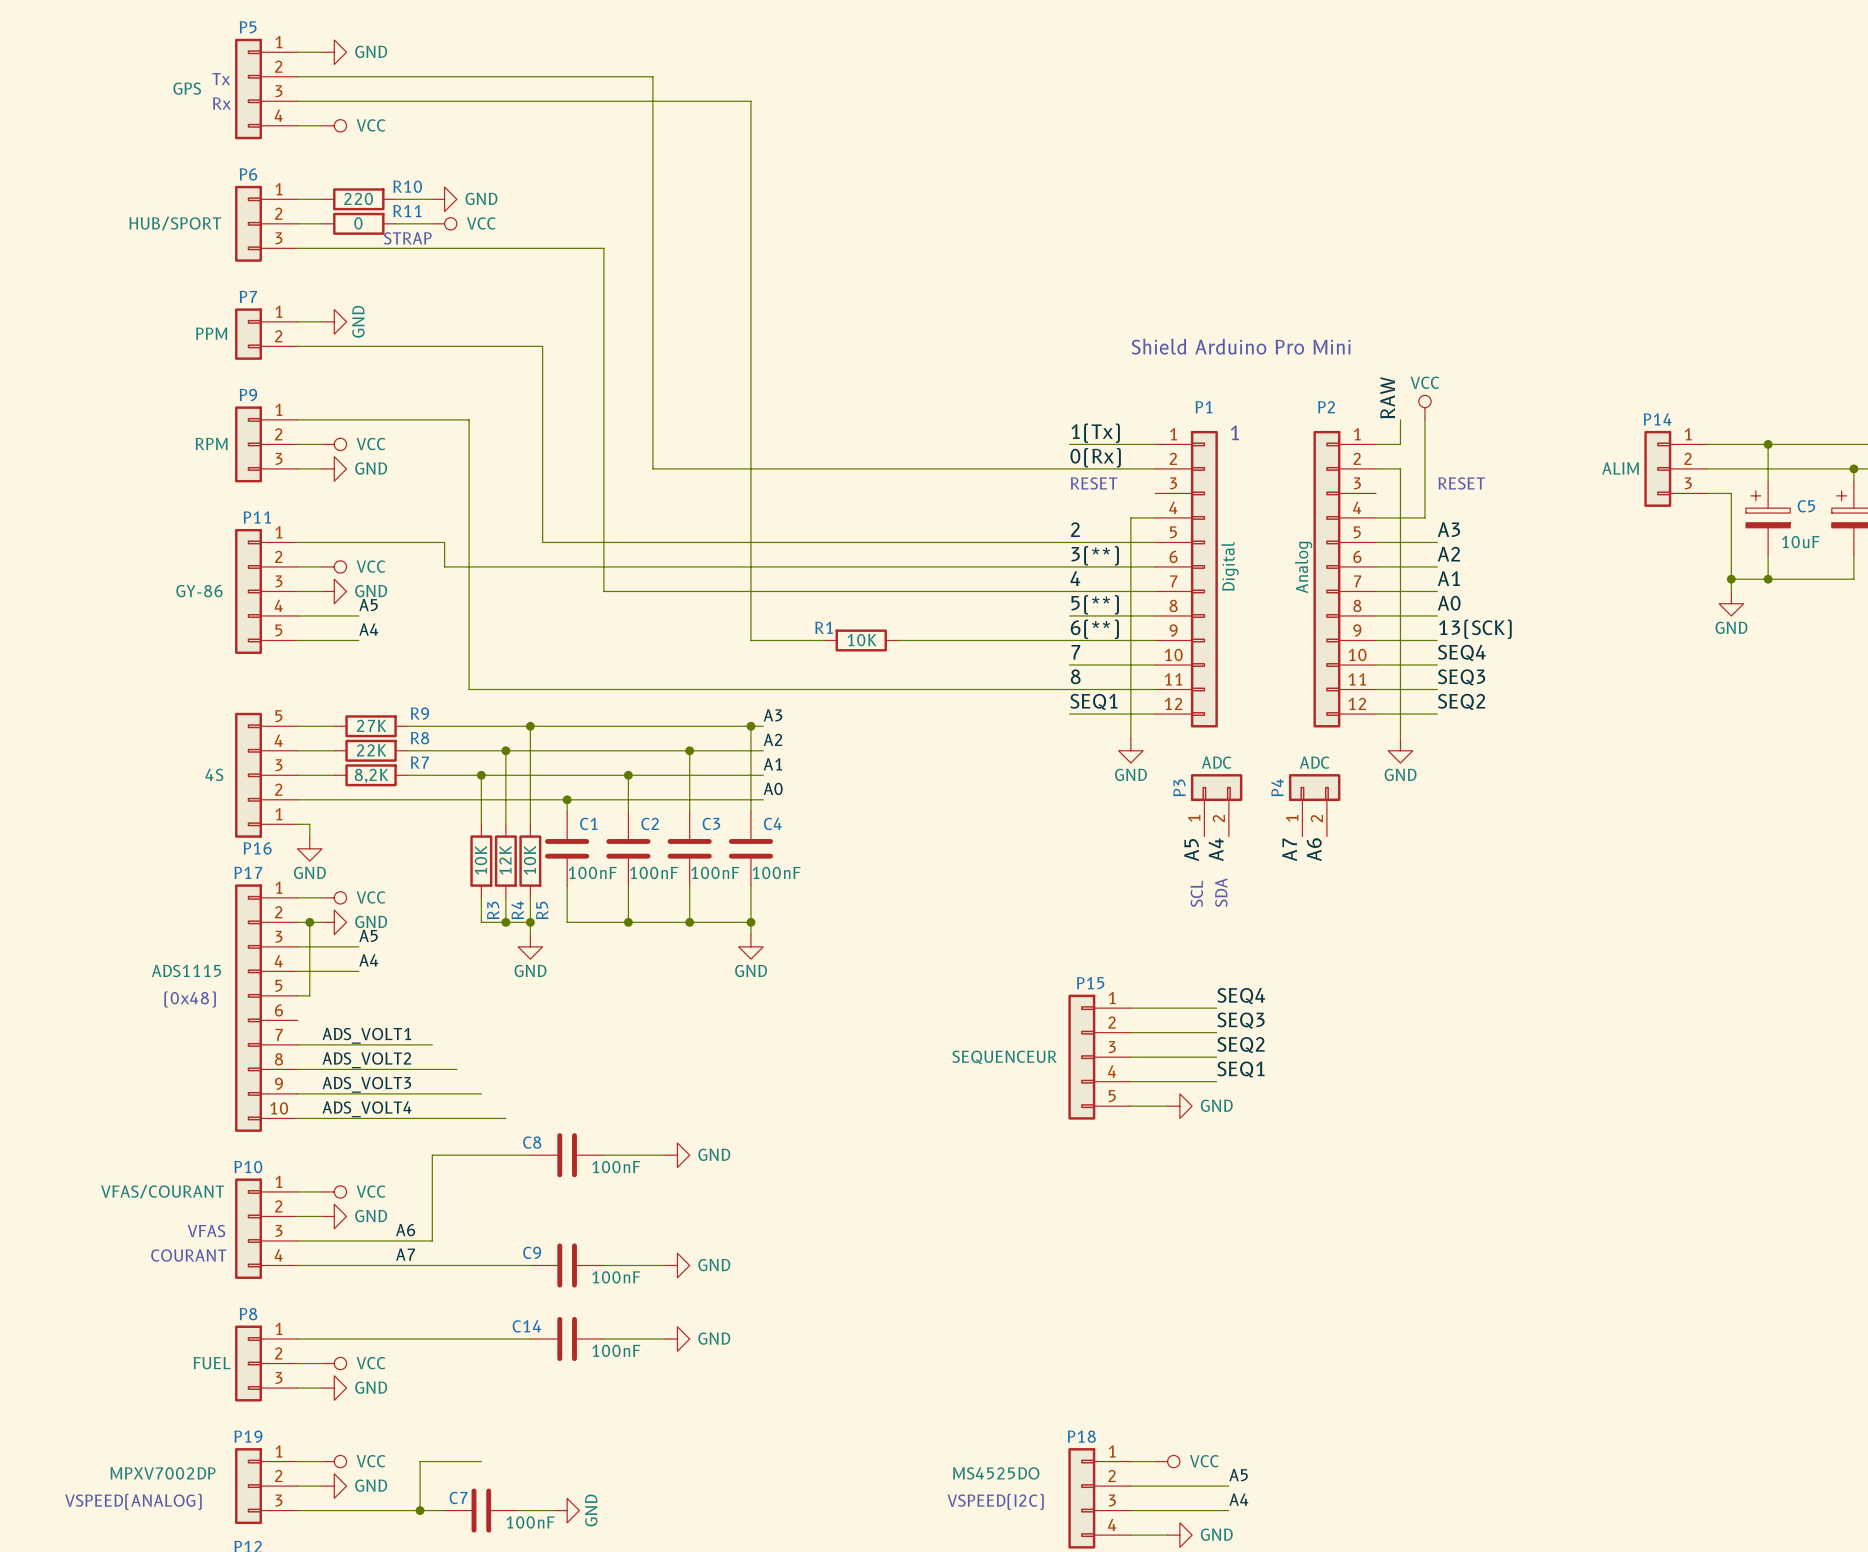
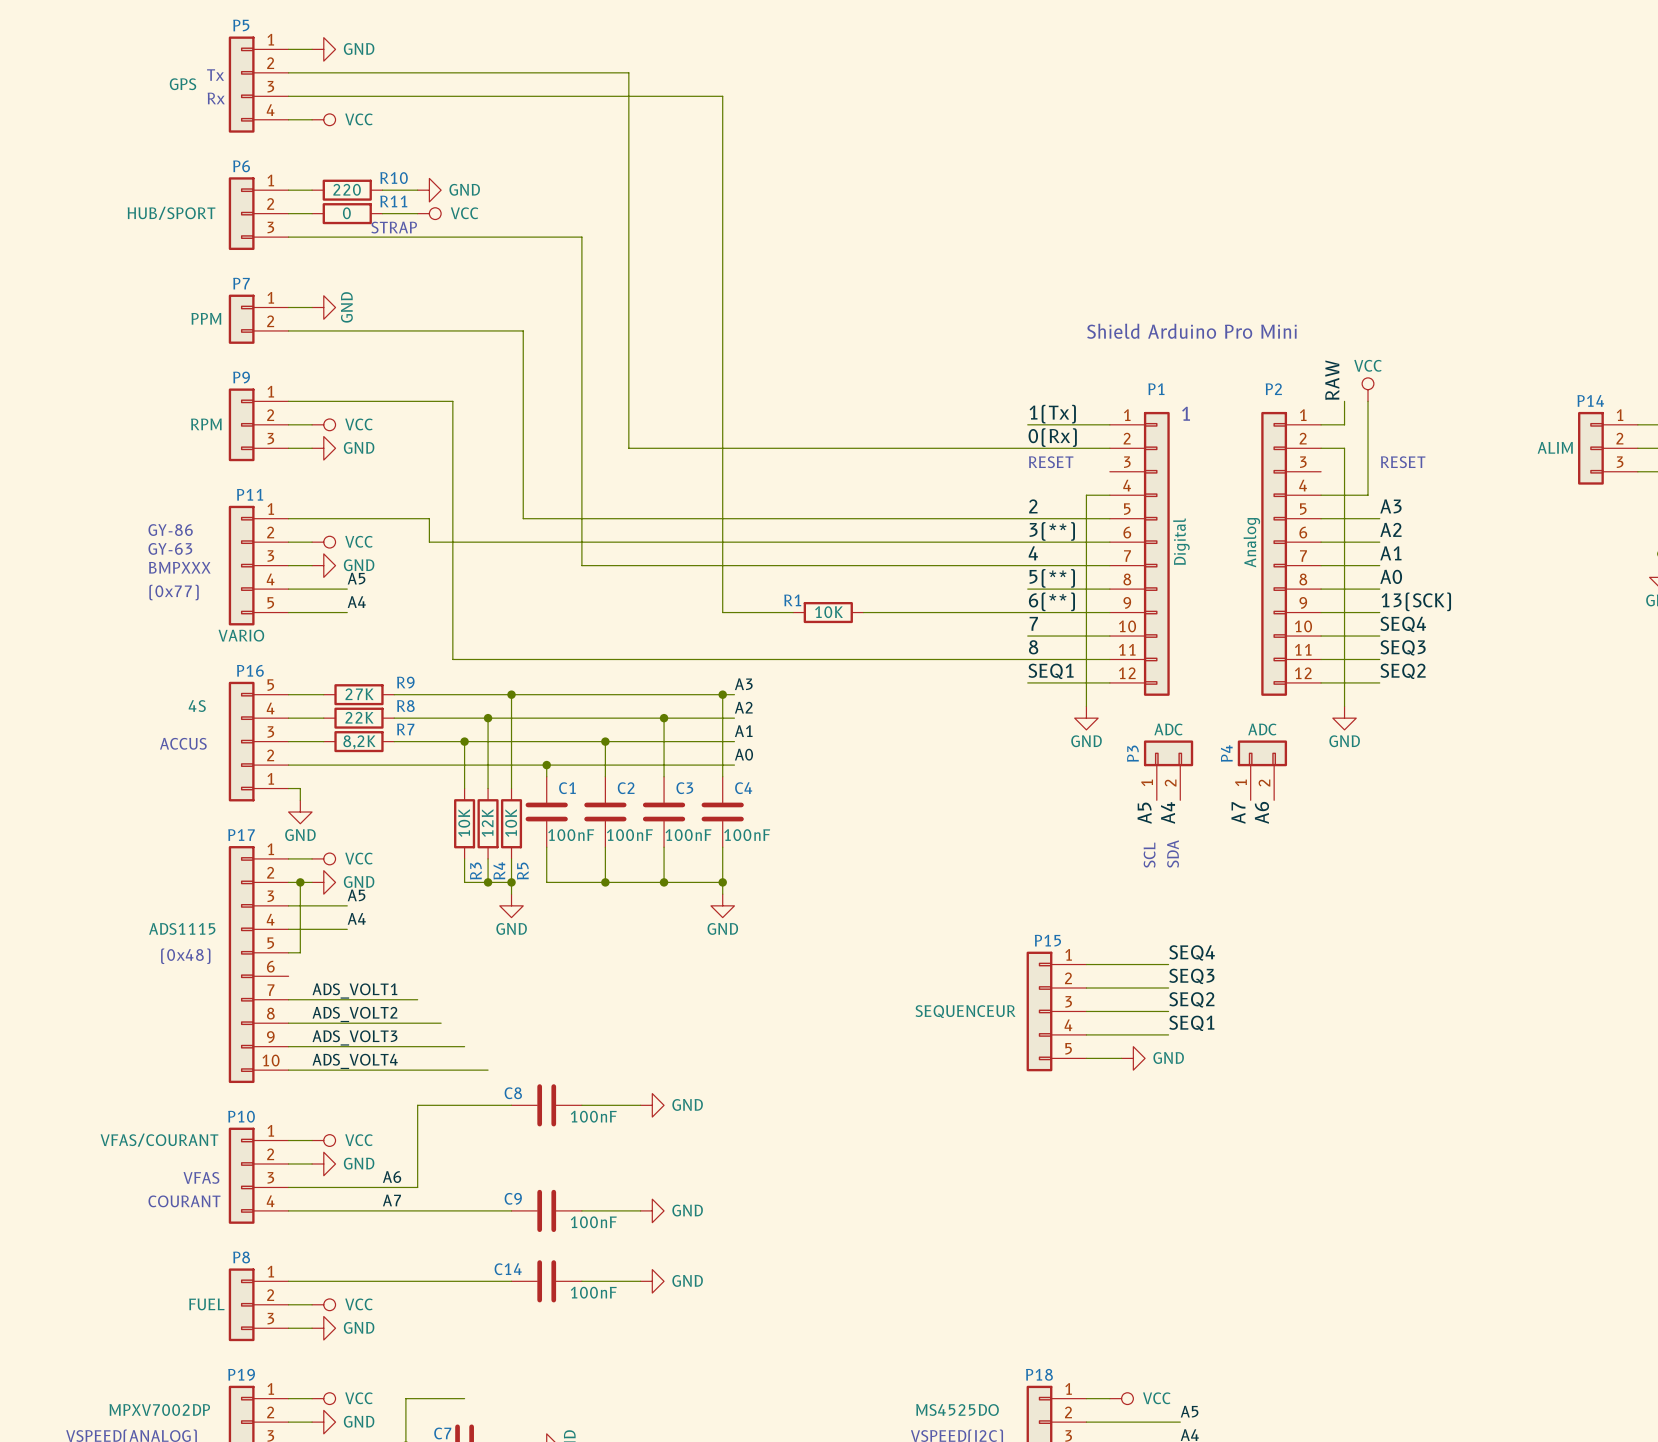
text: none -> GY-86 (170, 530)
text: none -> GY-63 (170, 548)
P11 value: GY-86 (199, 591) -> VARIO (241, 635)
text: none -> BMPXXX (179, 567)
text: none -> (0x77) (174, 592)
P16 value position: 4S (214, 774) -> 4S (197, 706)
text: none -> ACCUS (183, 743)
P16 name position: P16 (257, 848) -> P16 (250, 670)

